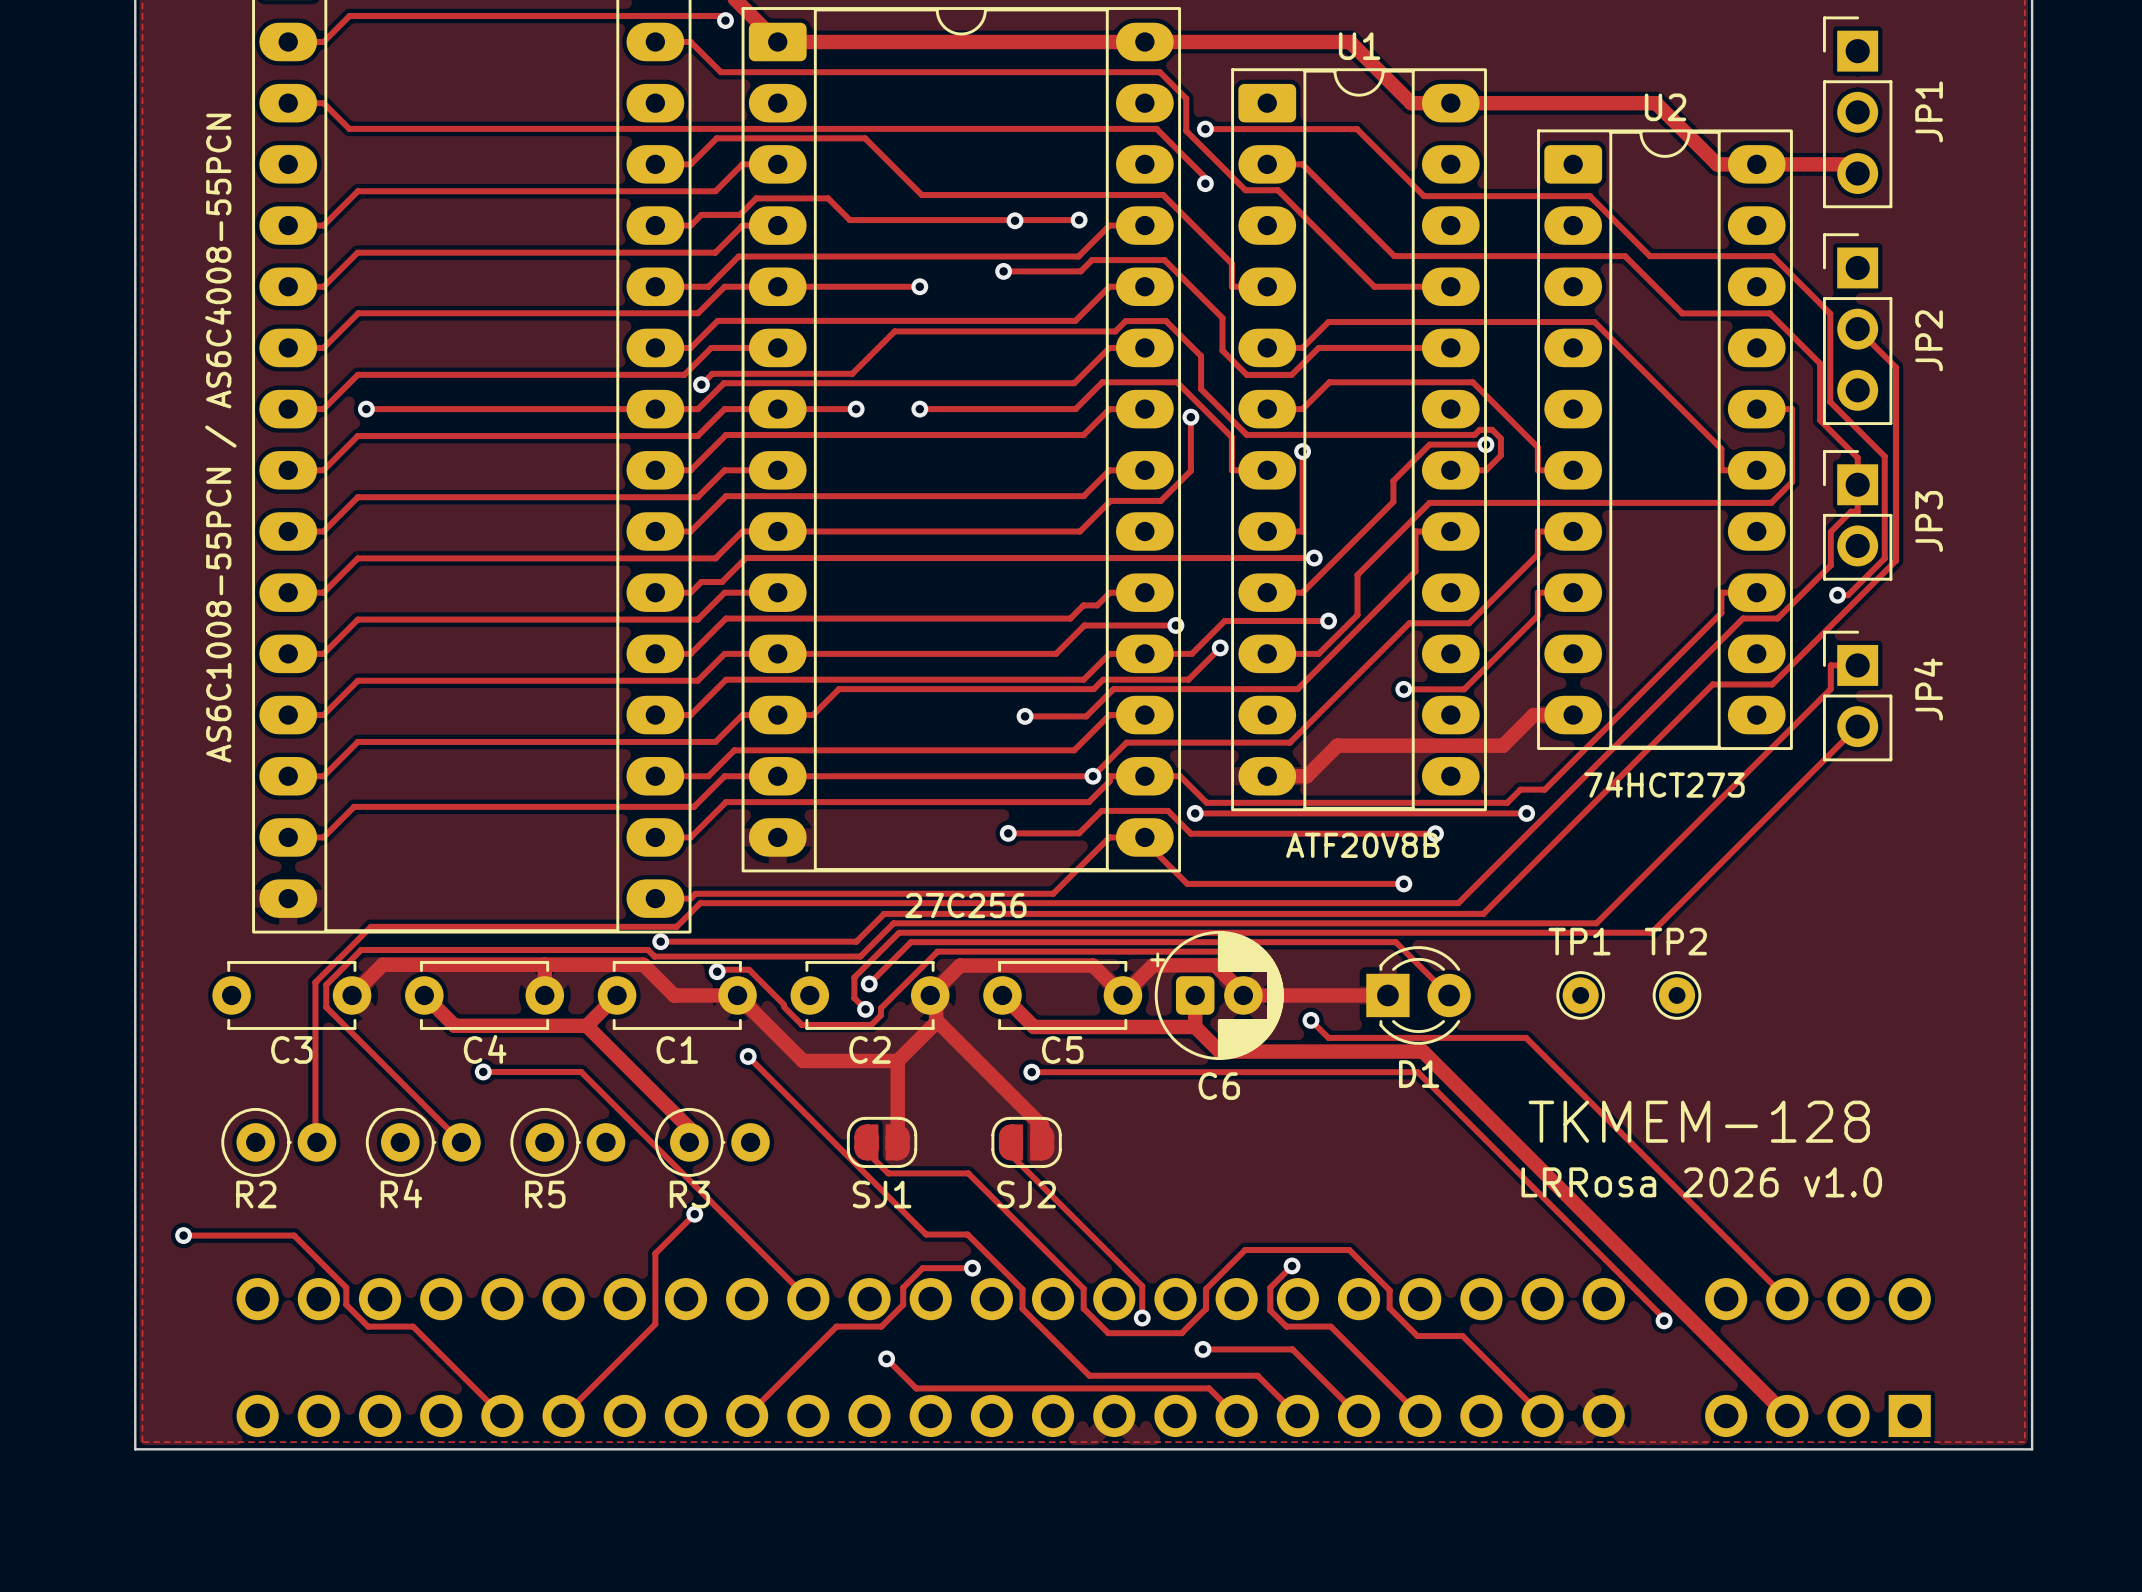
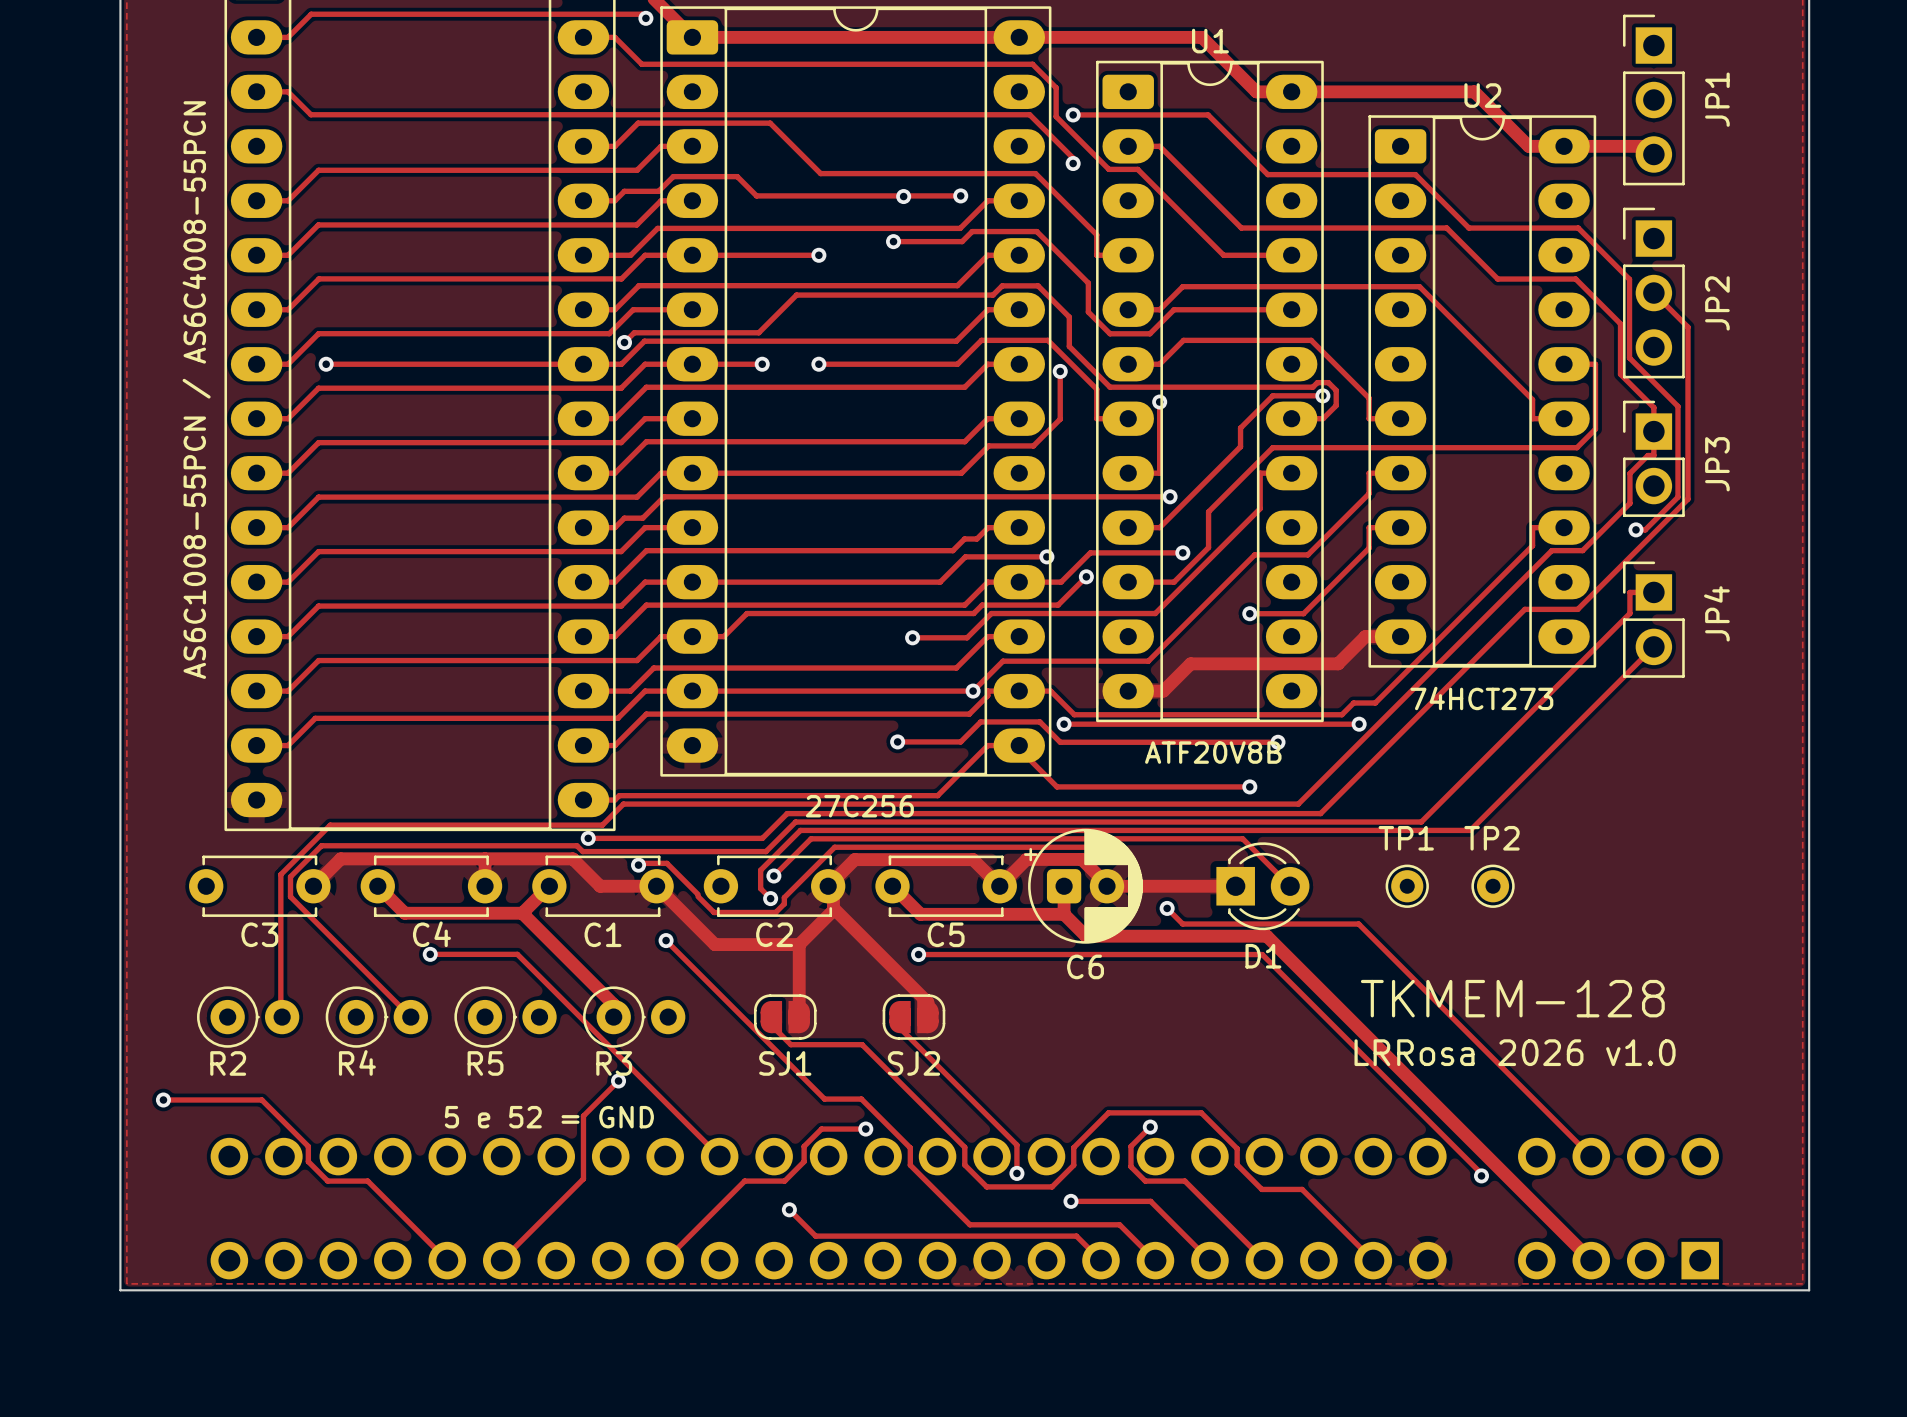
text: none -> 5 e 52 = GND (549, 1117)

